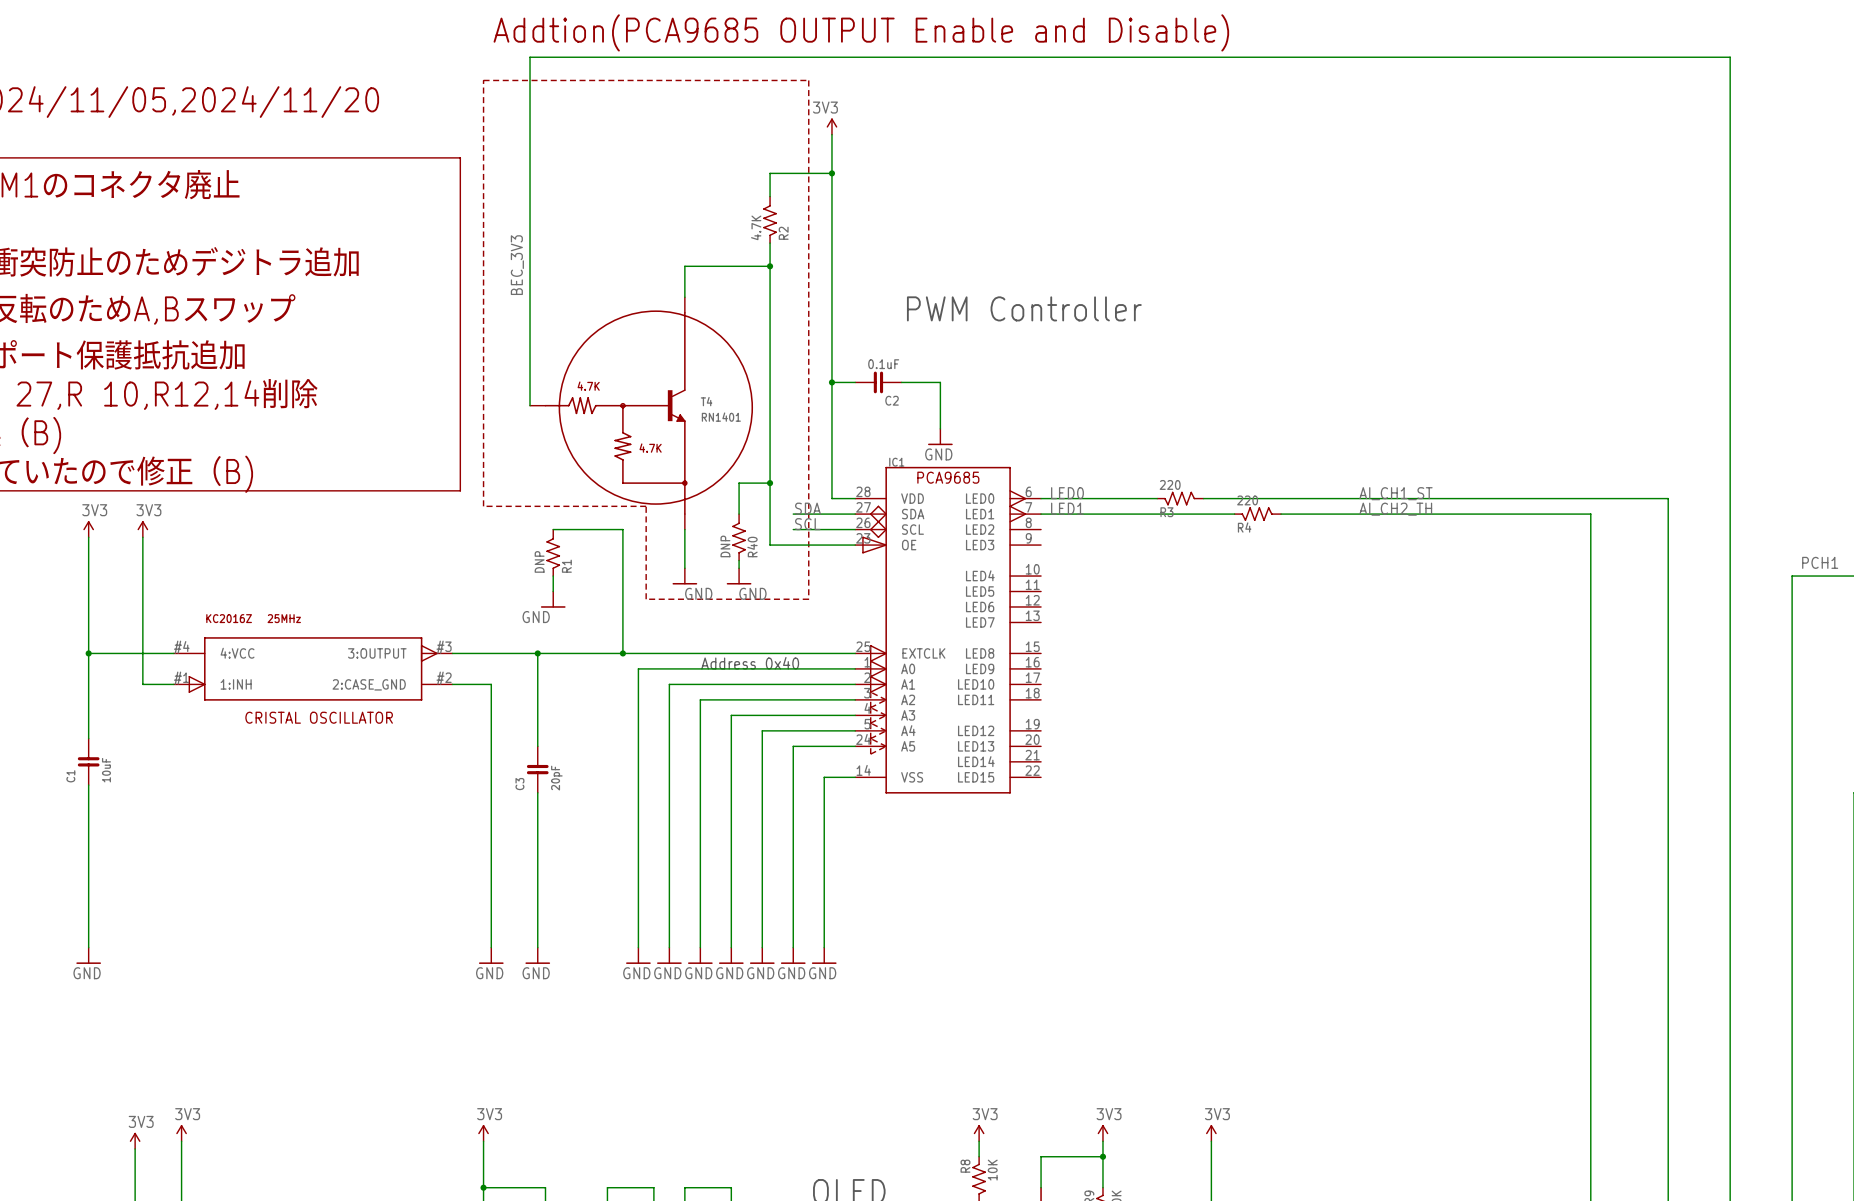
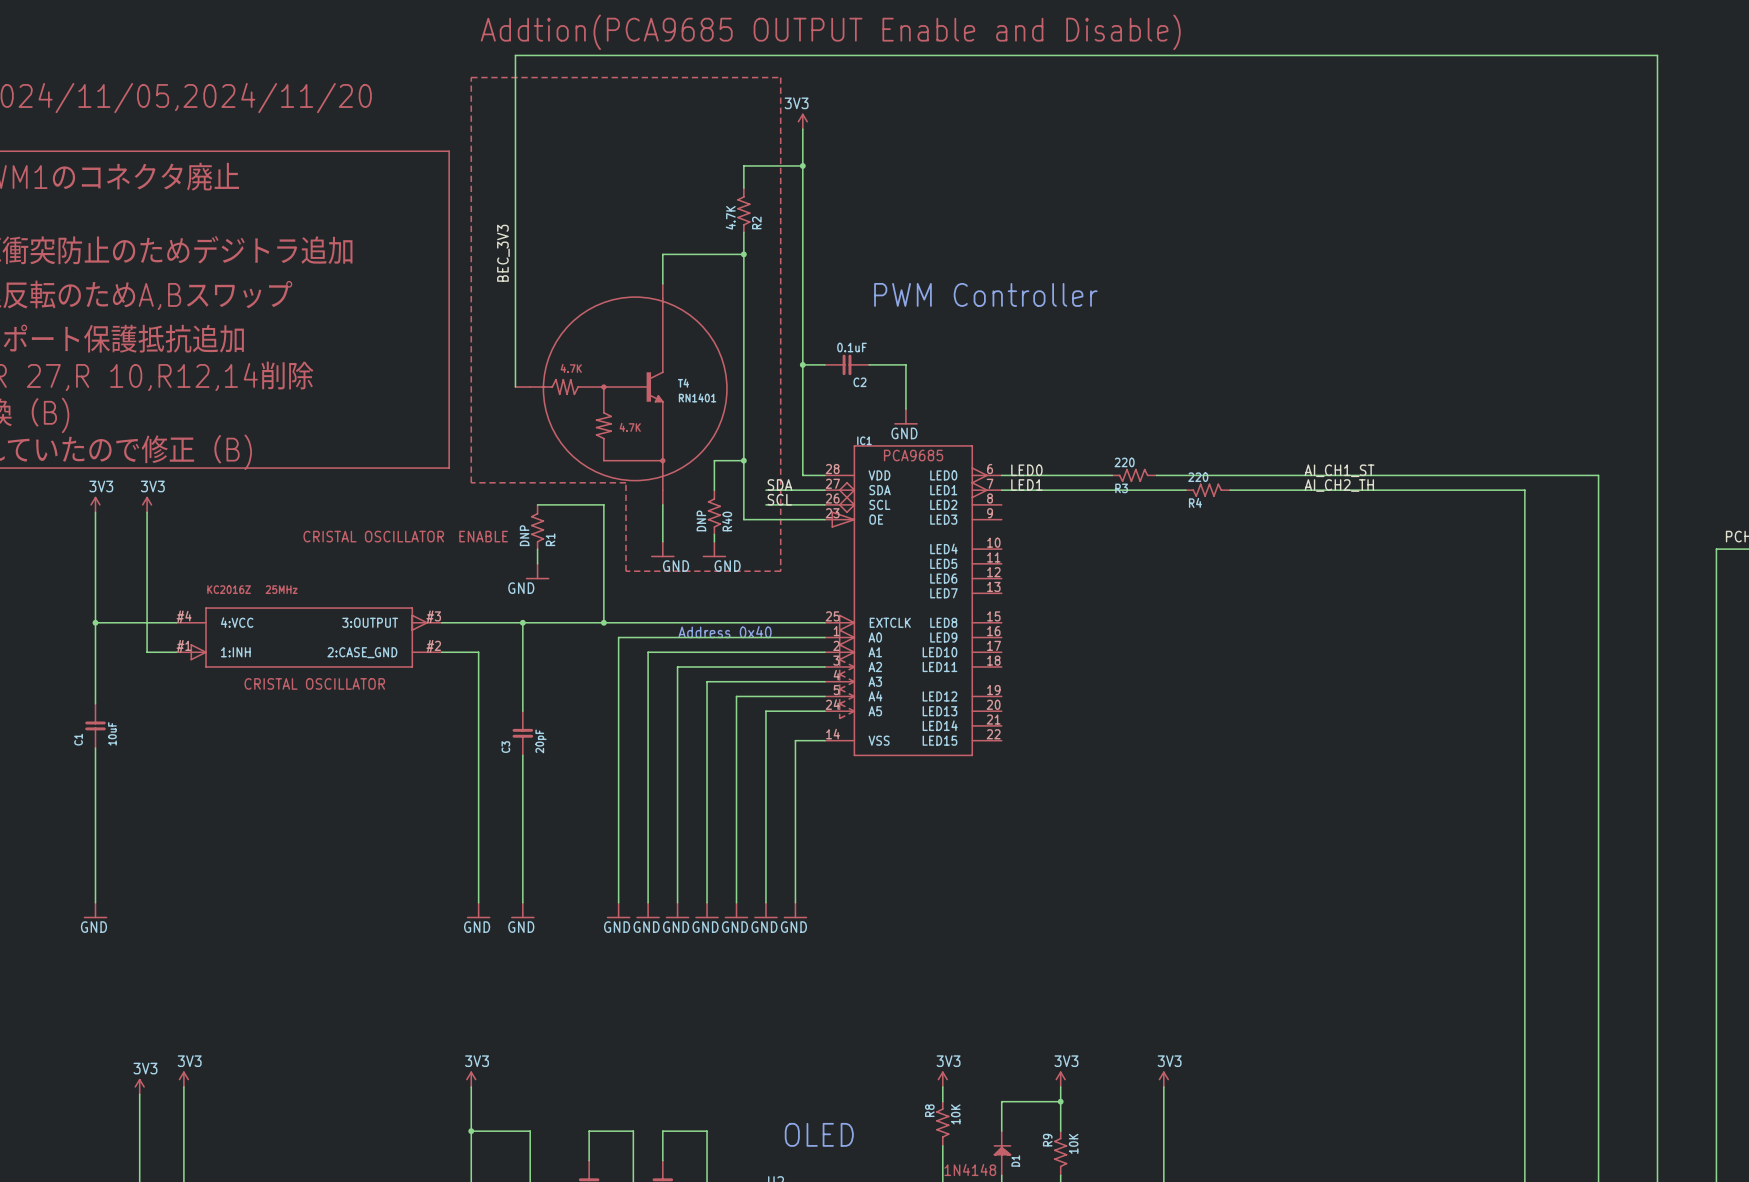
text: none -> CRISTAL OSCILLATOR ENABLE (405, 536)

